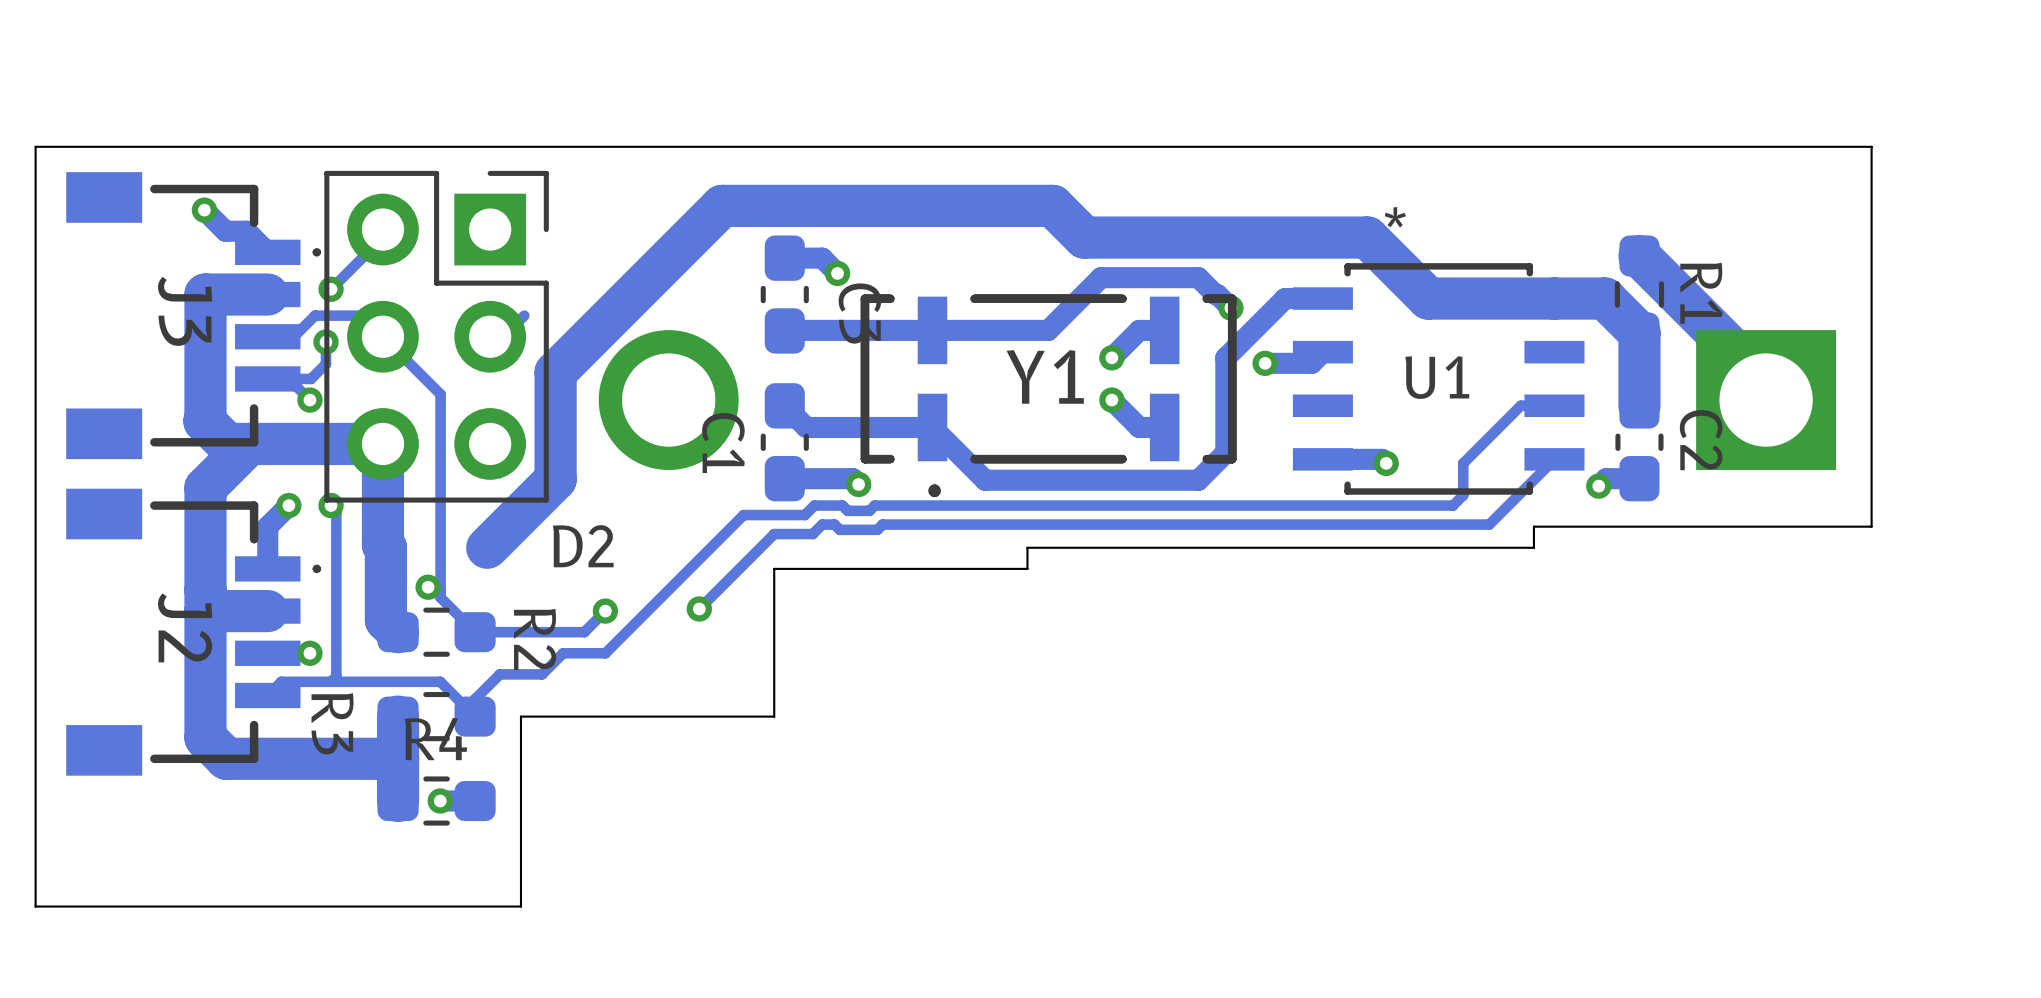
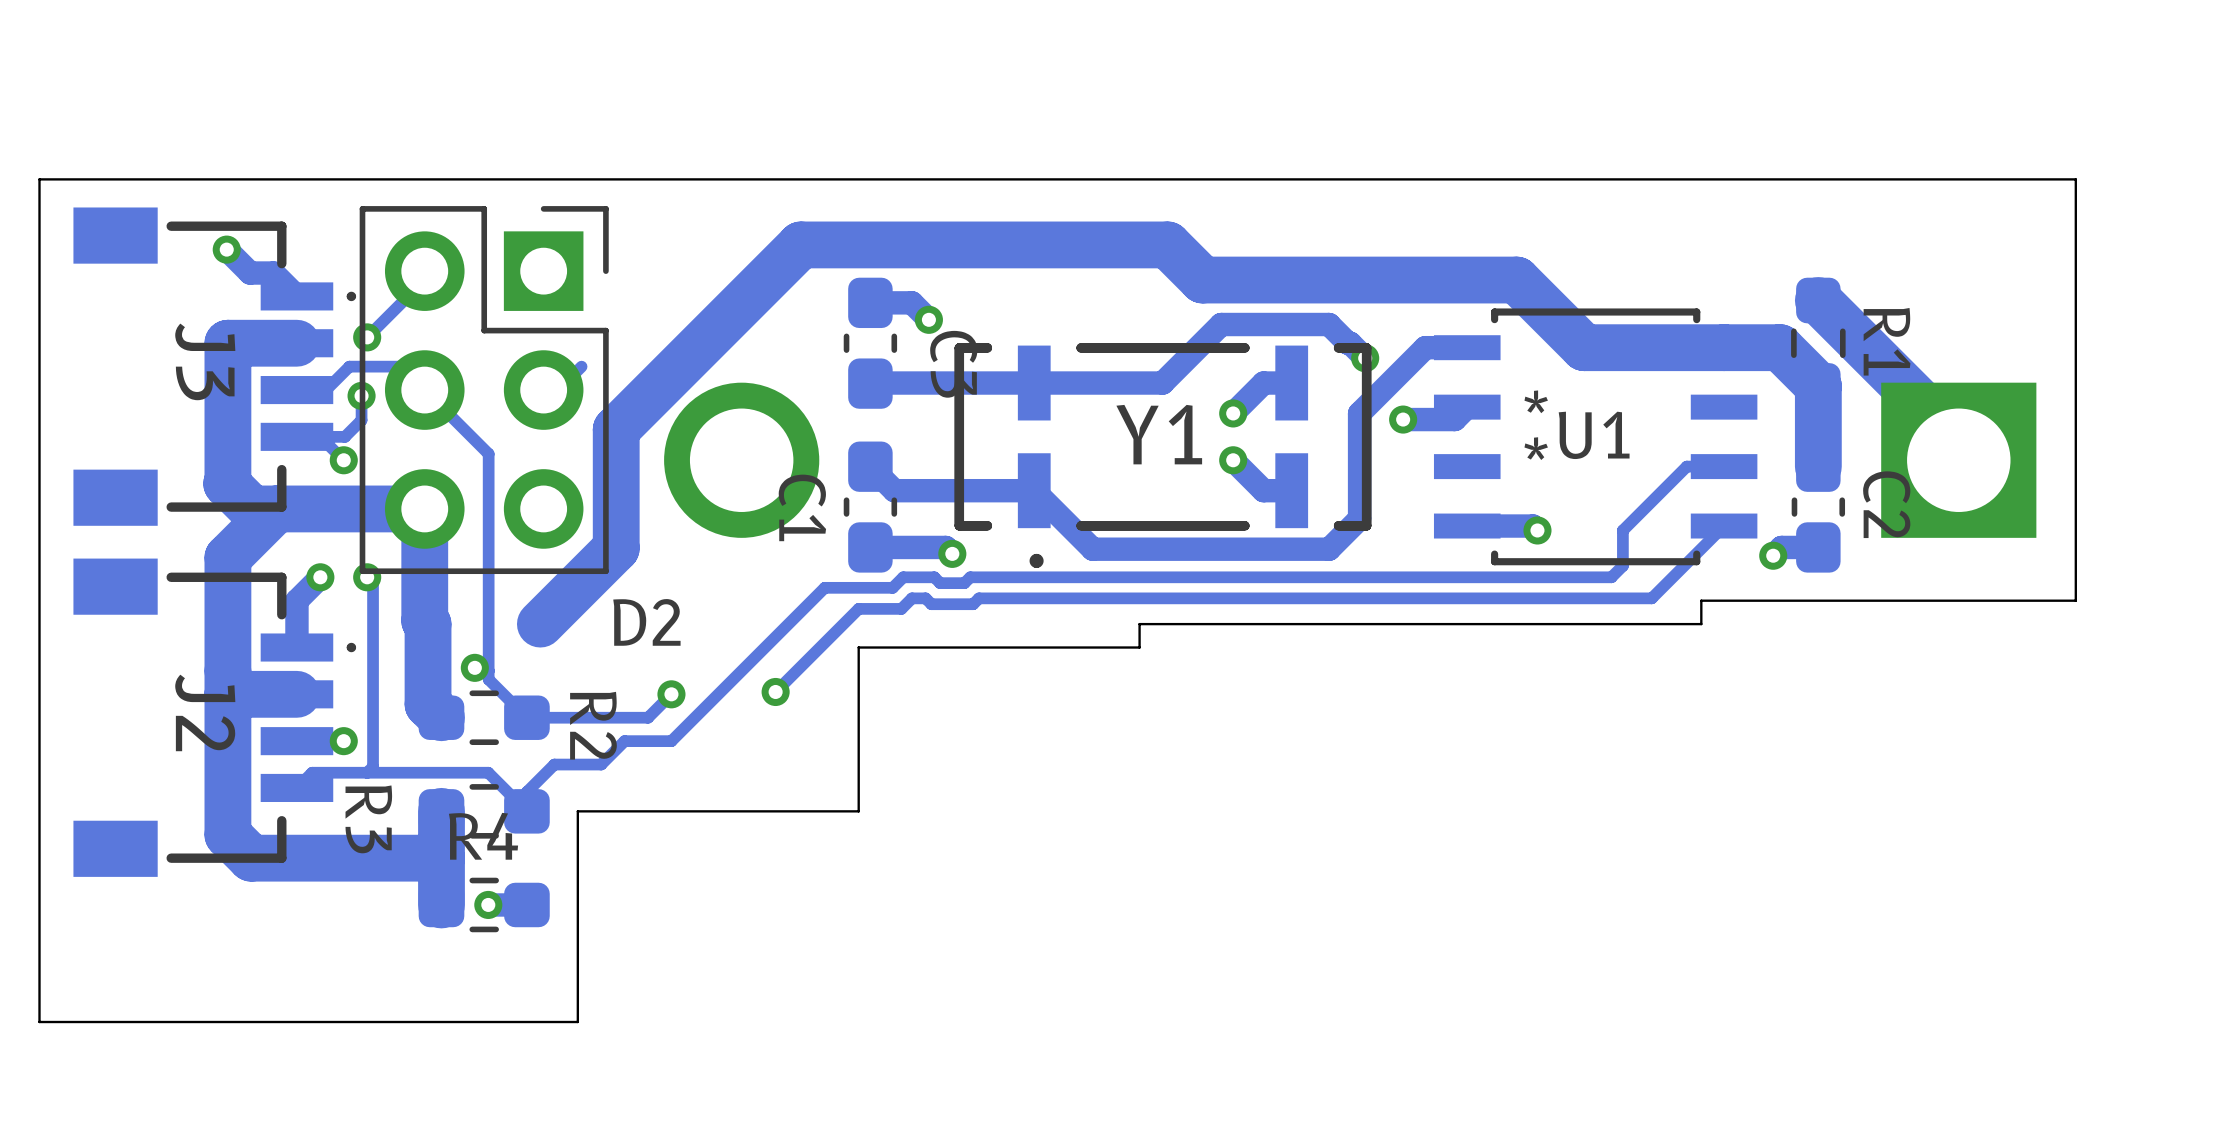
U1 text position: * (1395, 217) -> * (1536, 401)
U1 text: none -> * (1536, 448)

